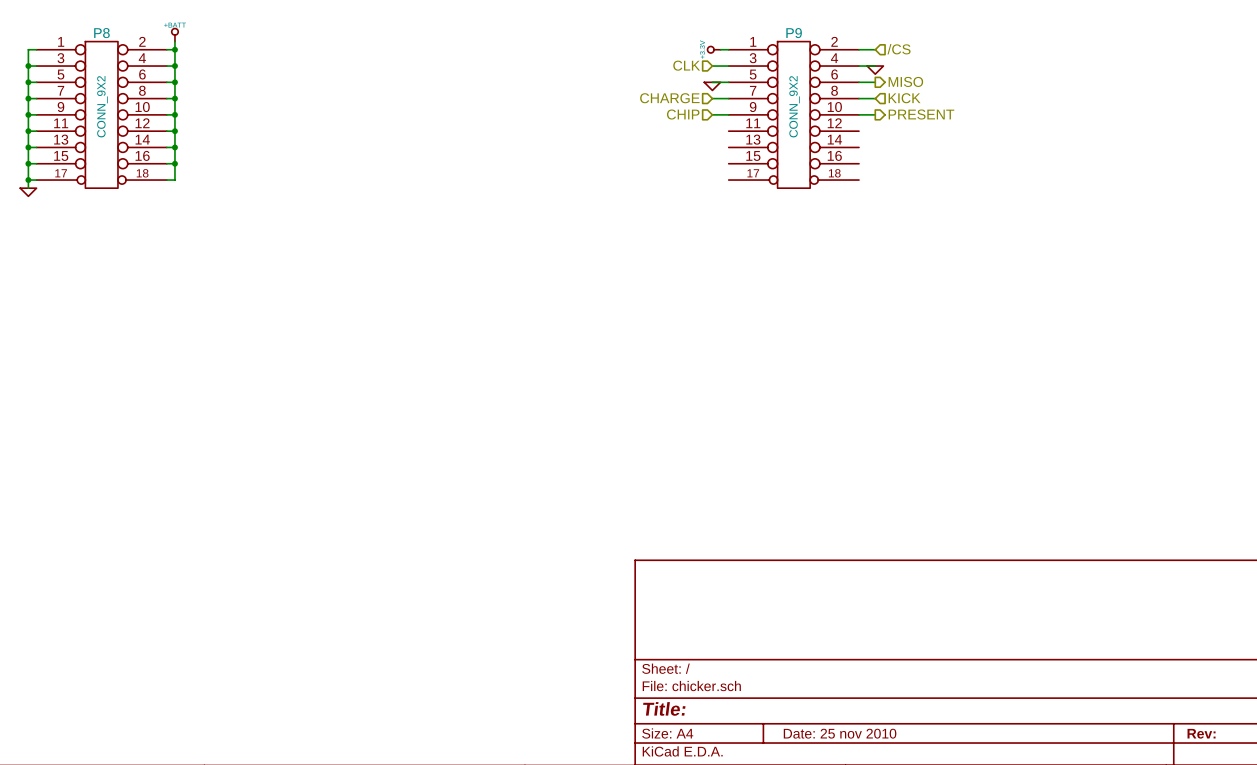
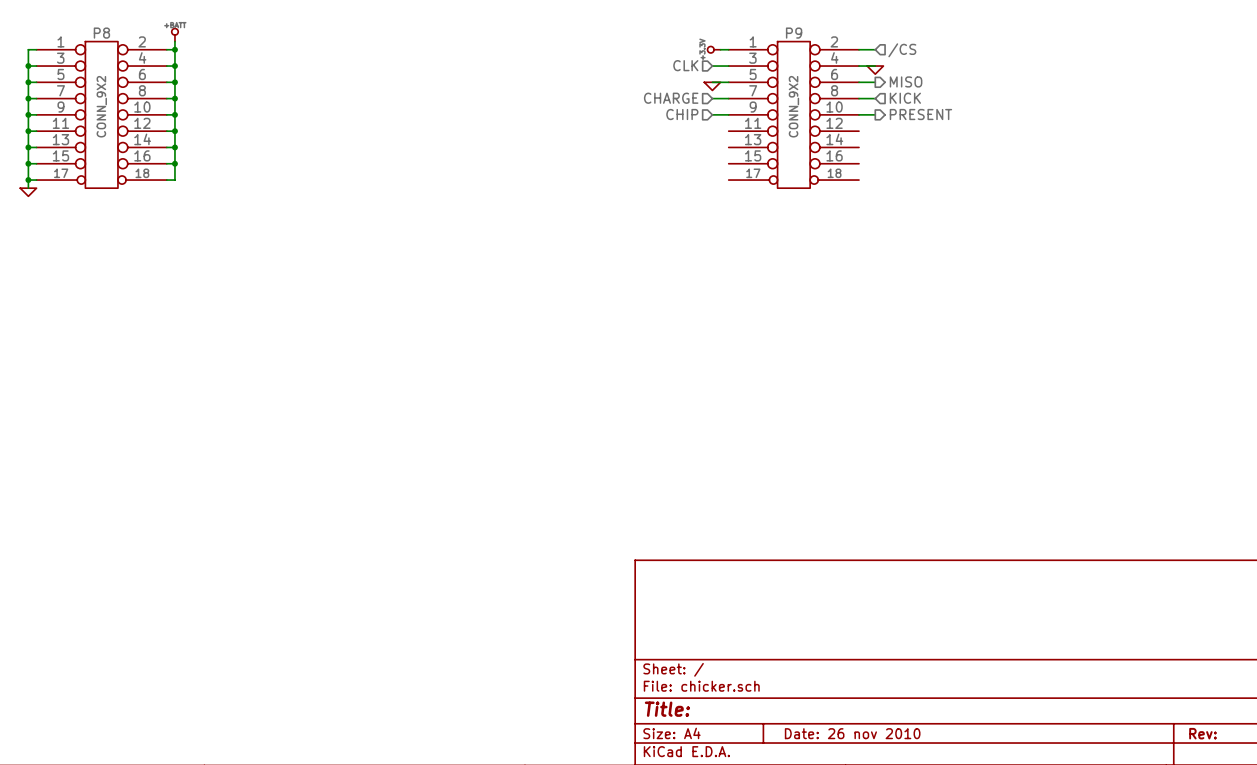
title block: Date: 25 nov 2010 (840, 733) -> Date: 26 nov 2010 (852, 733)

